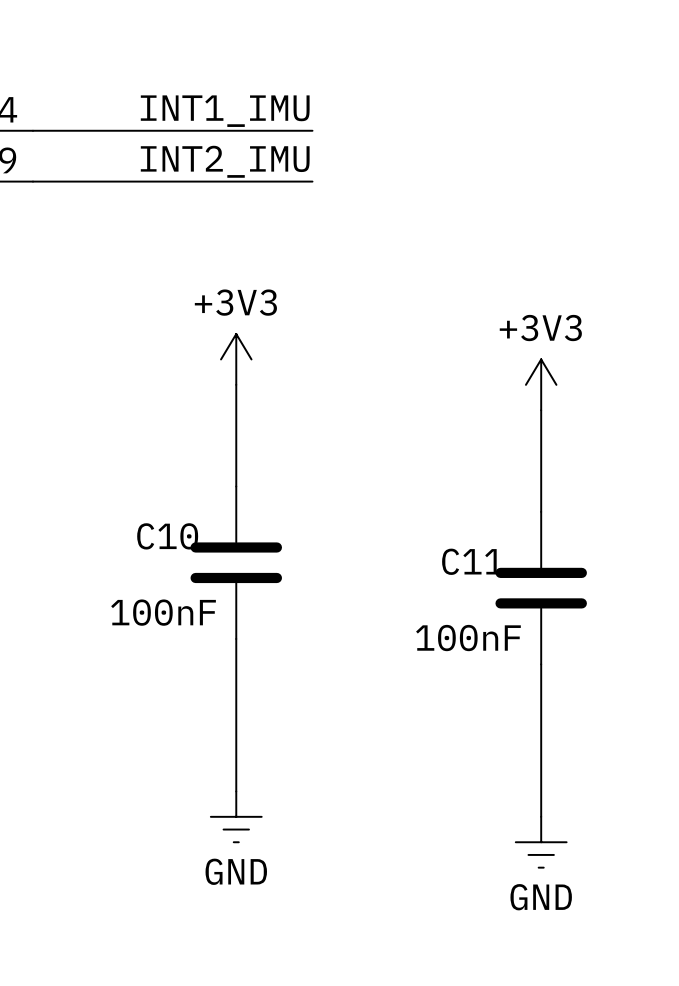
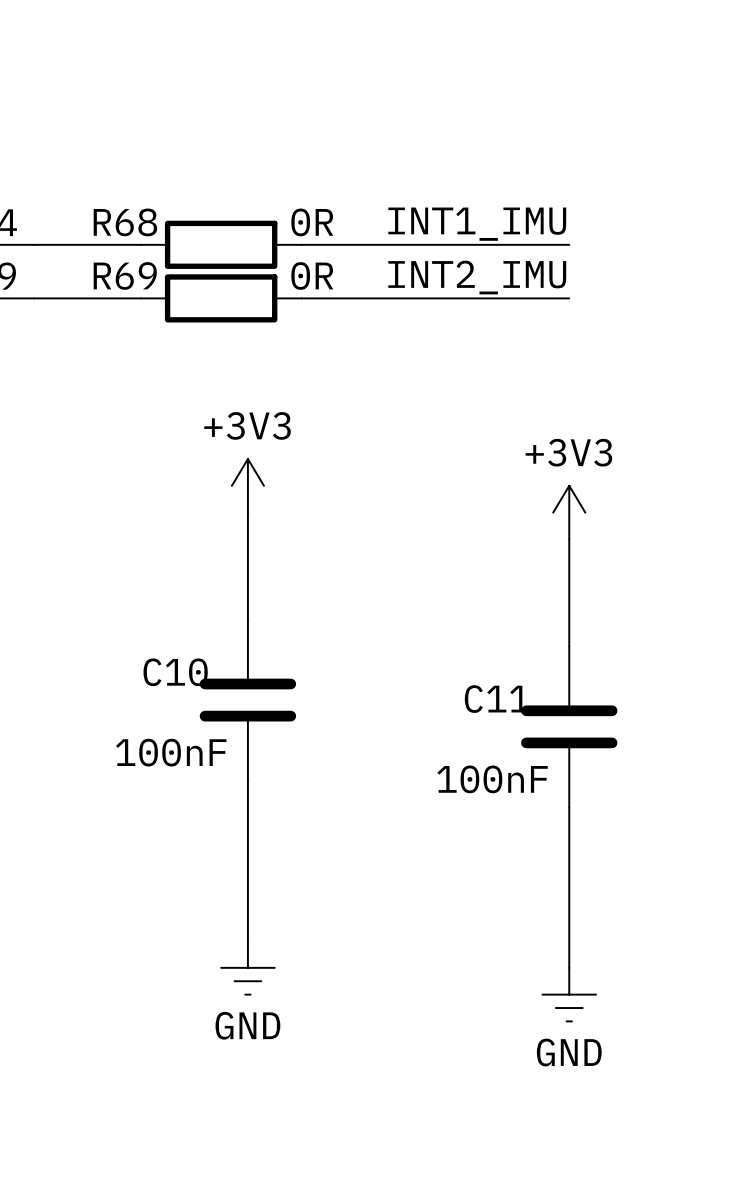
label position: INT1_IMU (225, 111) -> INT1_IMU (477, 224)
wire: (134, 130) (287, 130) -> none
R68: none -> 0R (221, 244)
wire: none -> (328, 244) (569, 244)
label position: INT2_IMU (225, 161) -> INT2_IMU (477, 277)
wire: (134, 181) (287, 181) -> none
R69: none -> 0R (221, 298)
wire: none -> (328, 298) (569, 298)

